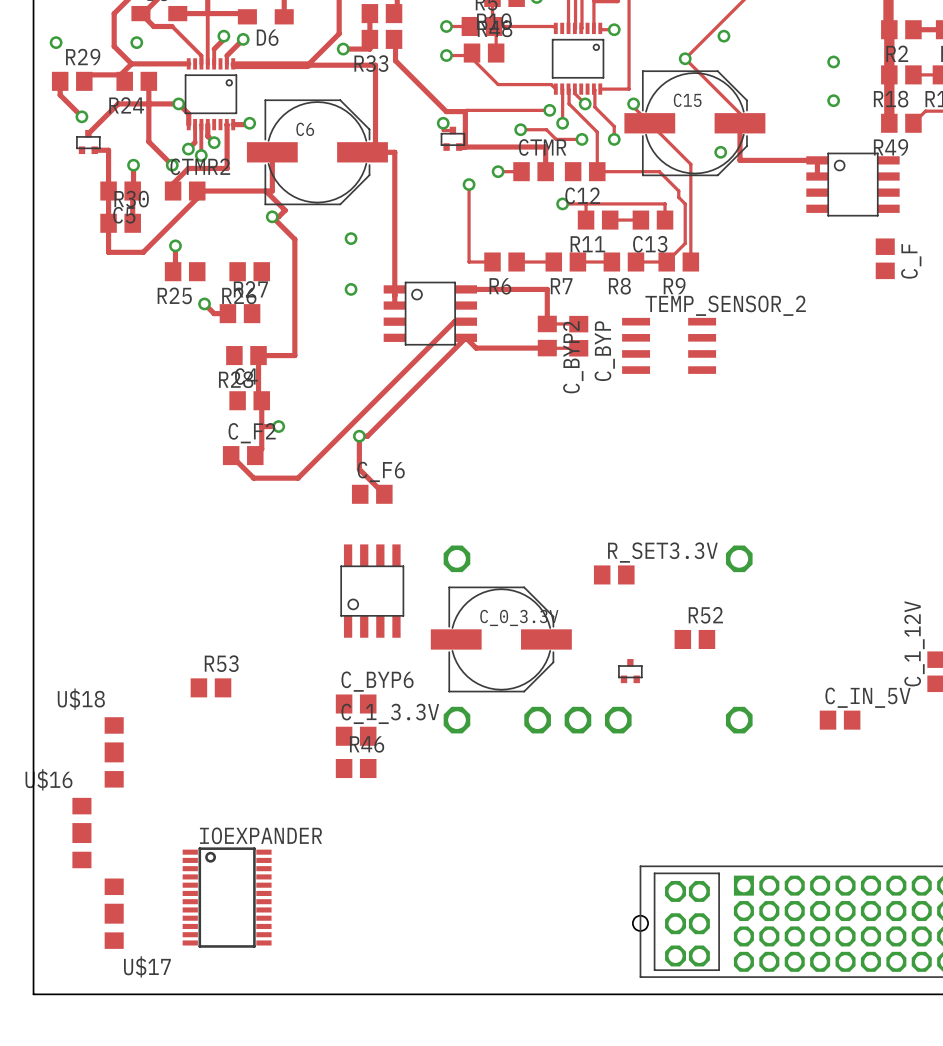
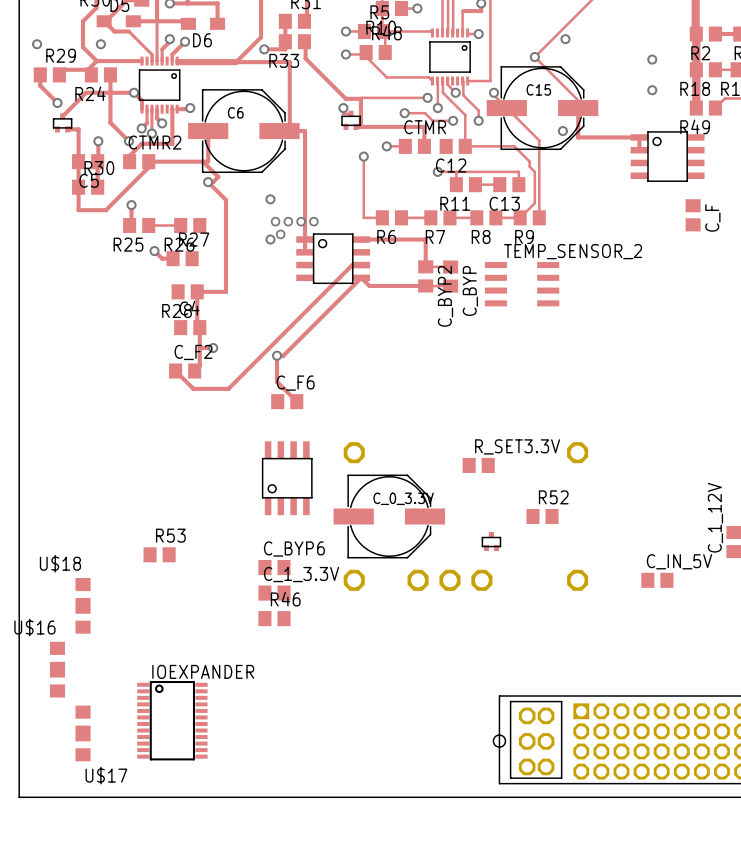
via: none -> (275, 221)
via: none -> (288, 221)
via: none -> (301, 221)
via: none -> (313, 221)
track: none -> (147, 225) (181, 225)
via: none -> (280, 234)

